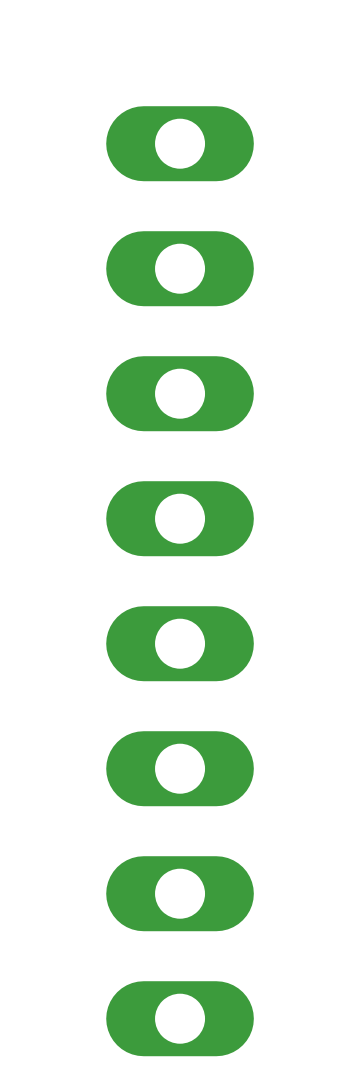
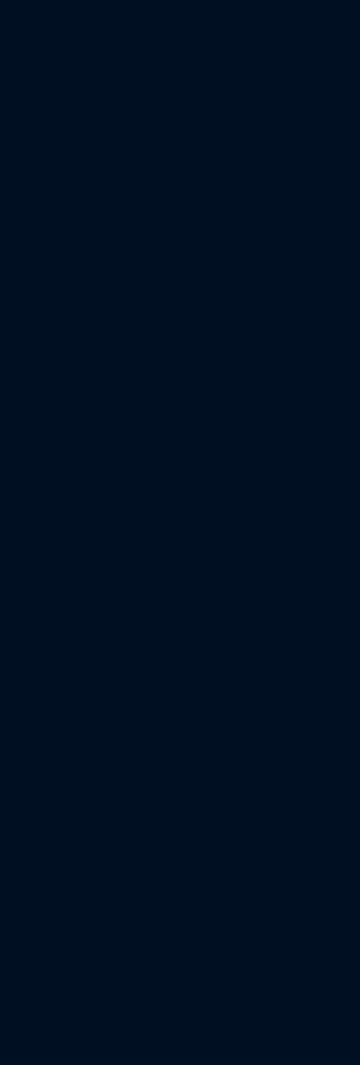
part: (180, 581) -> none

